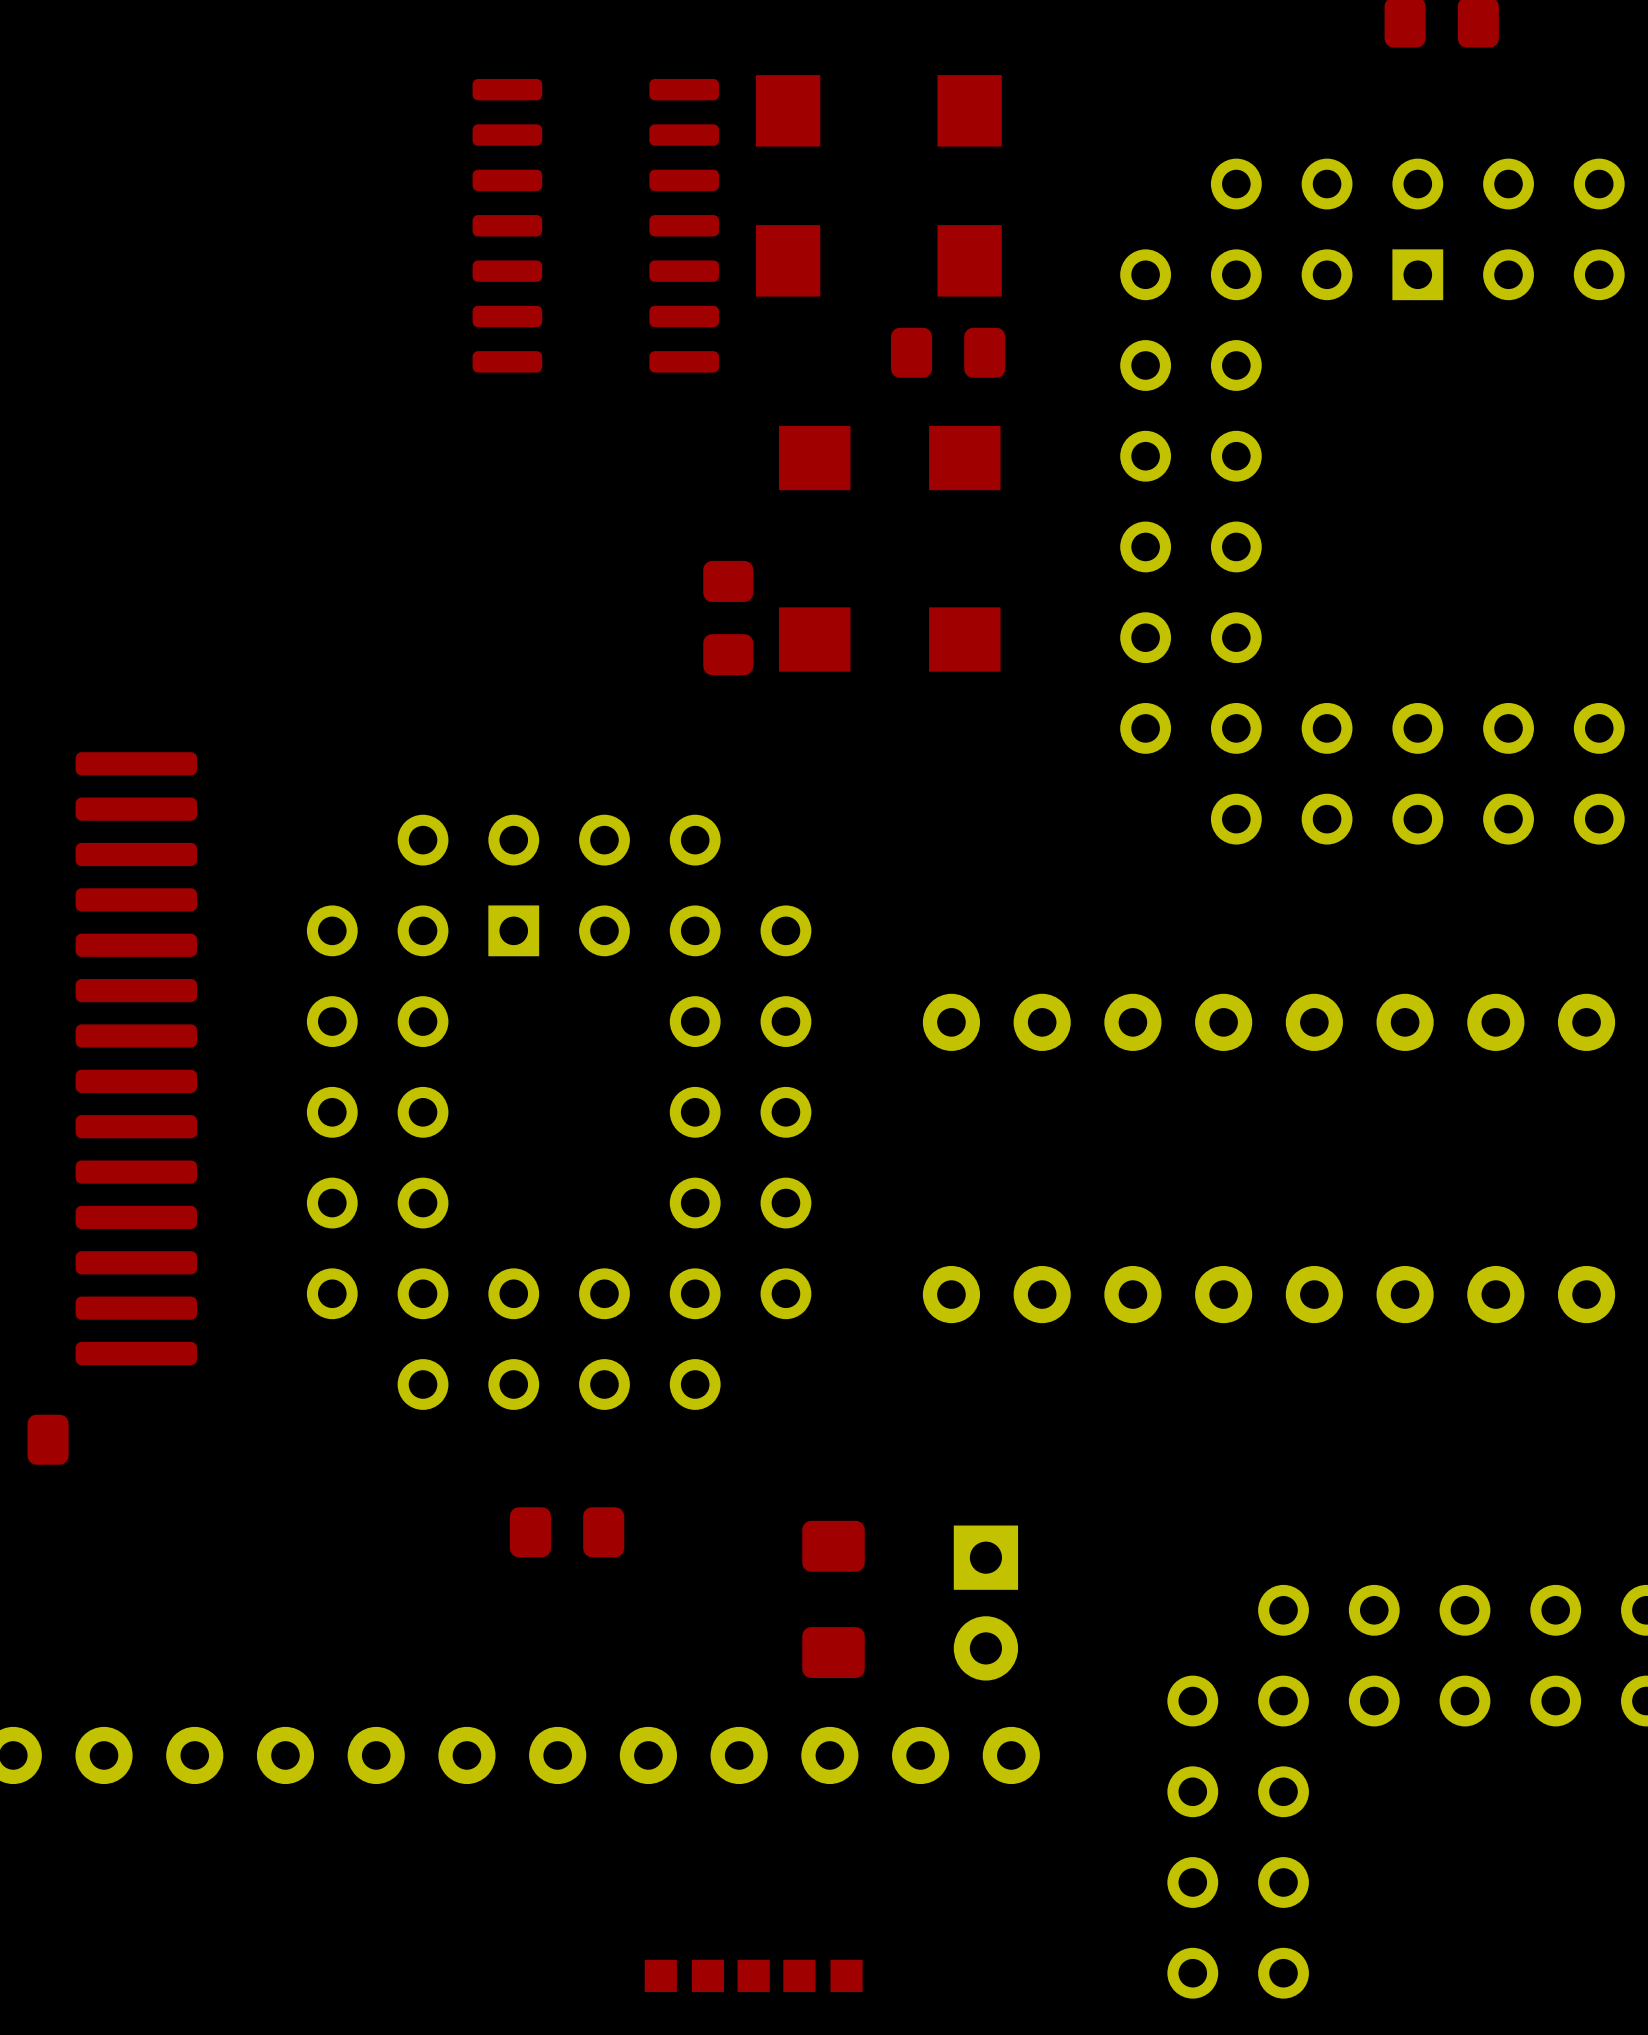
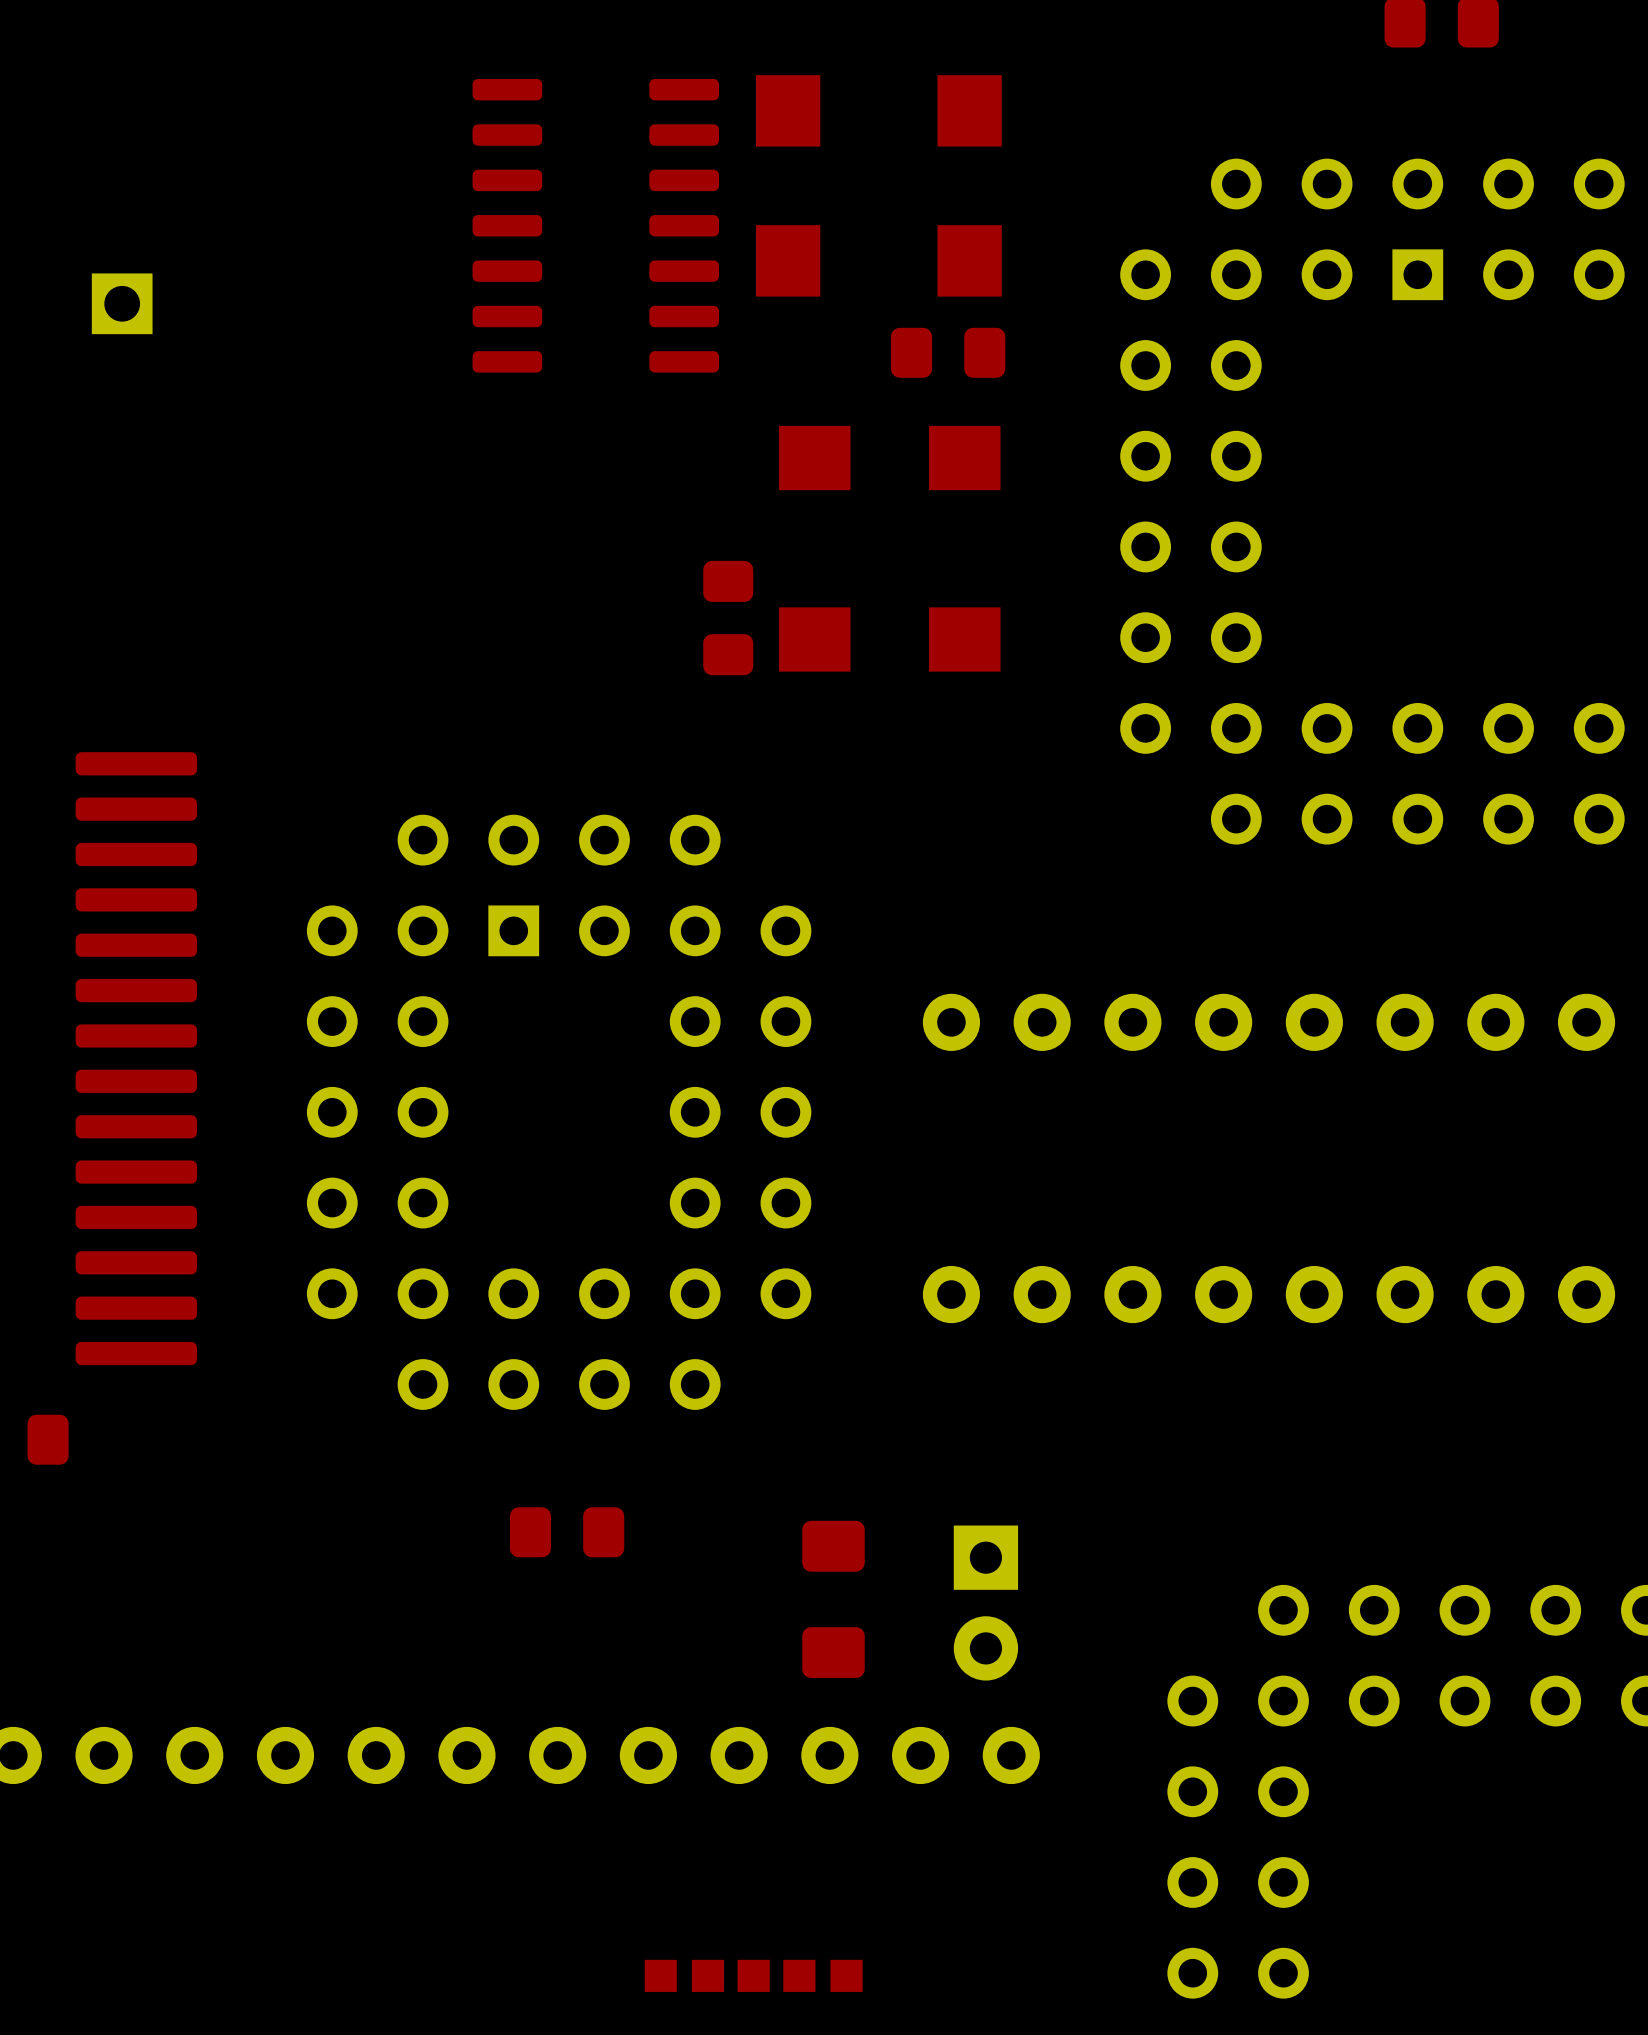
part: none -> (122, 303)

